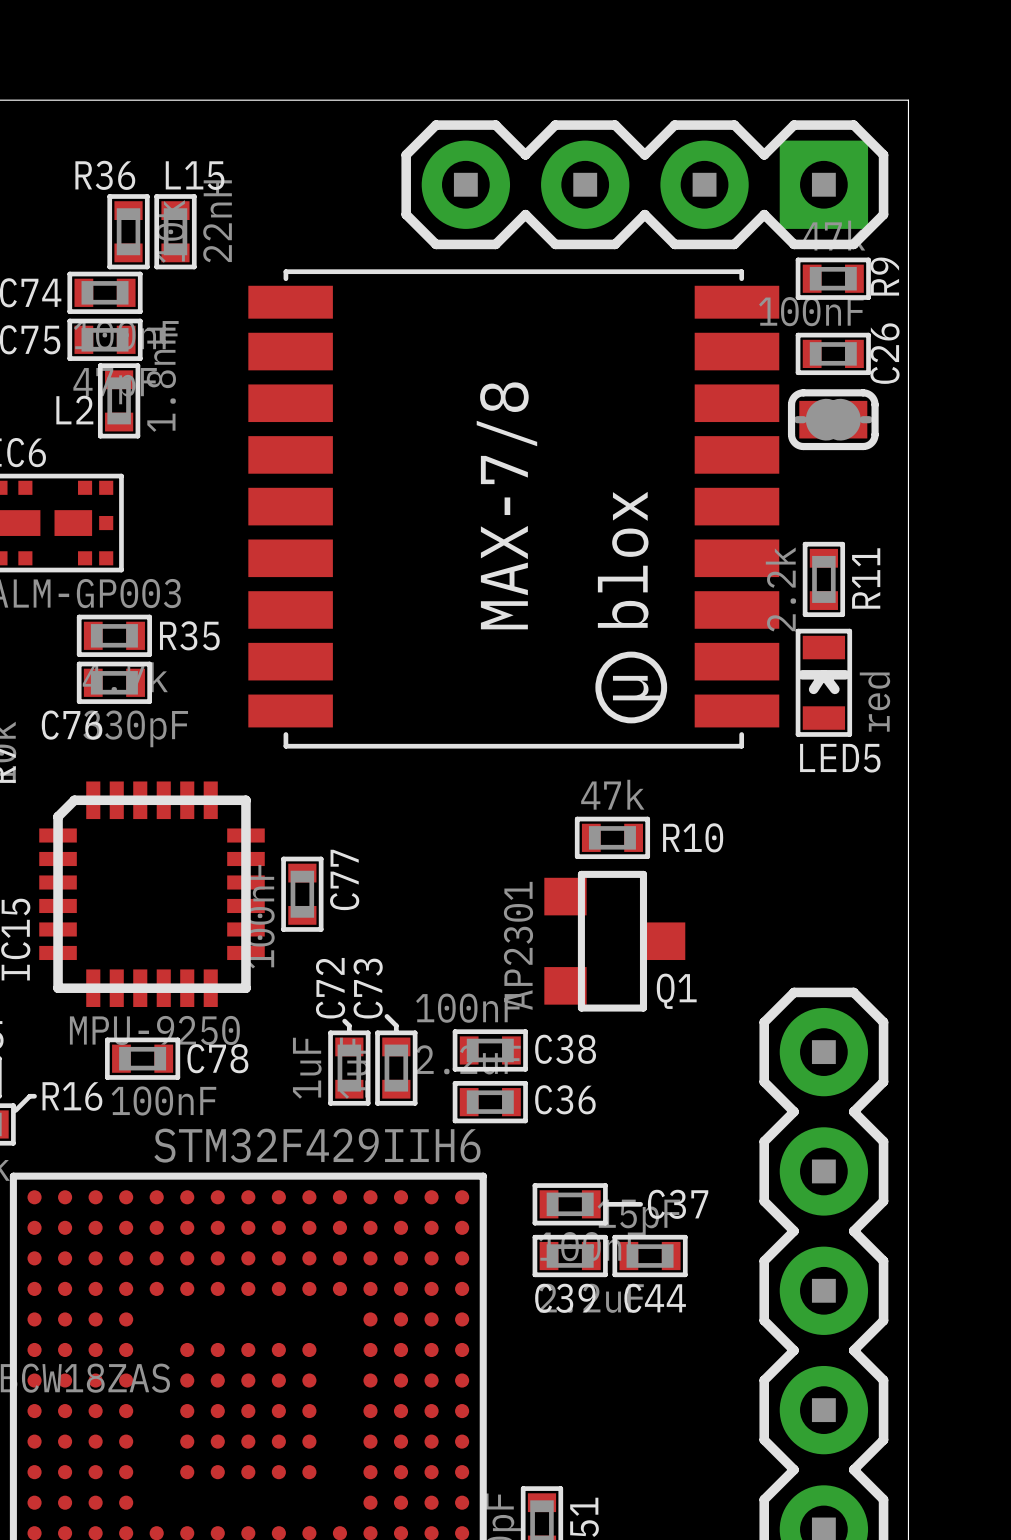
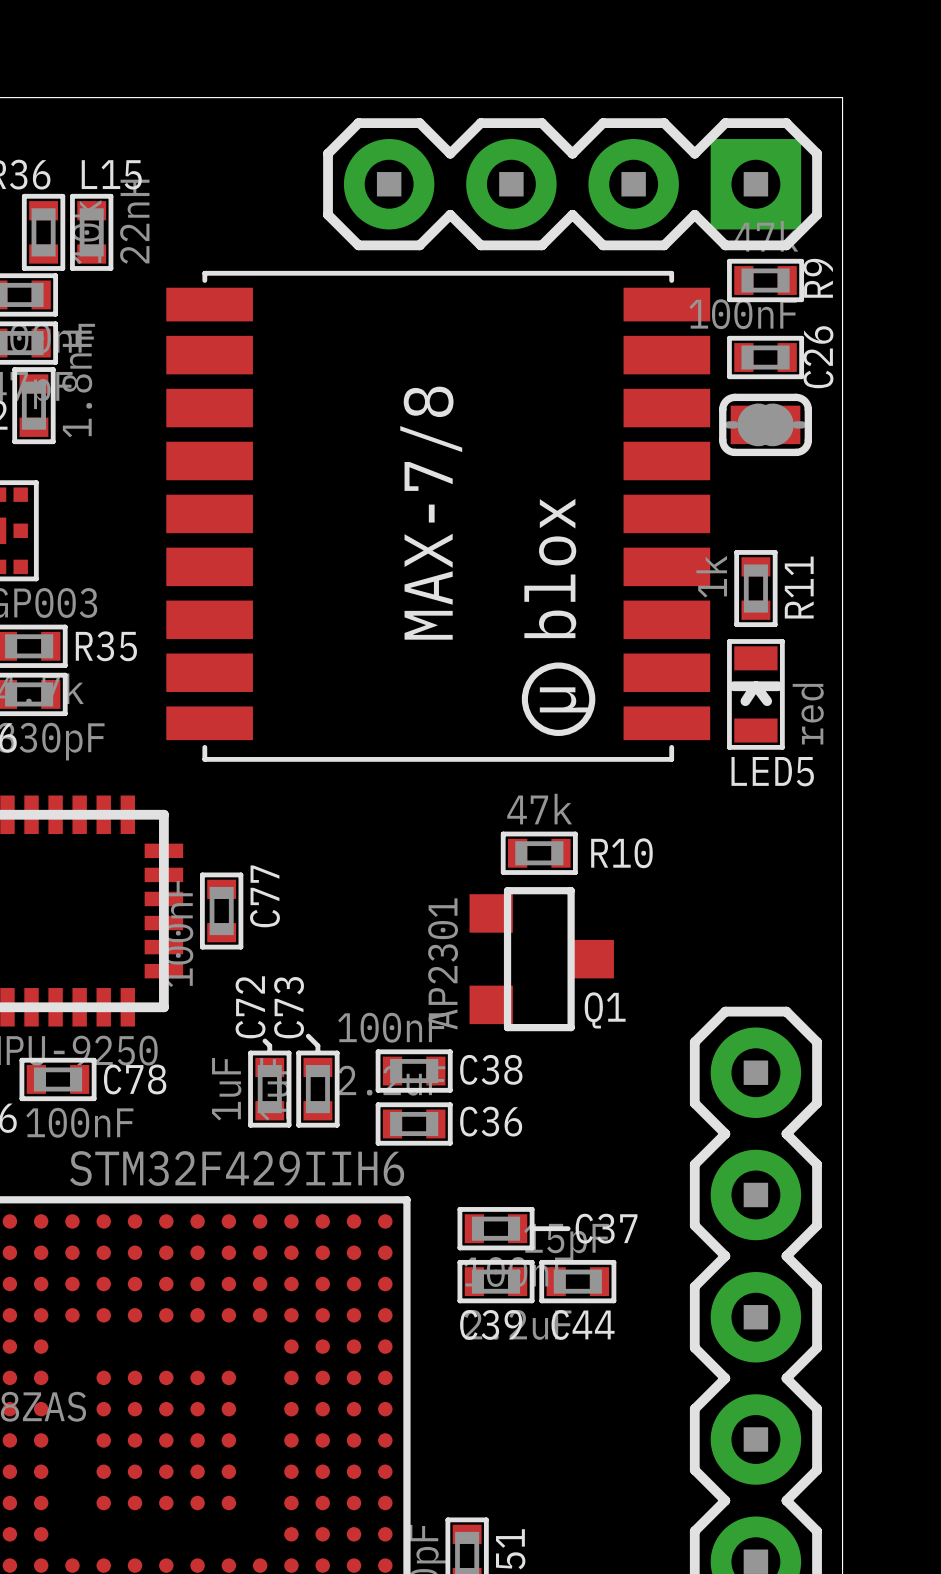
R11 value: 2.2k (780, 589) -> 1k (711, 576)

